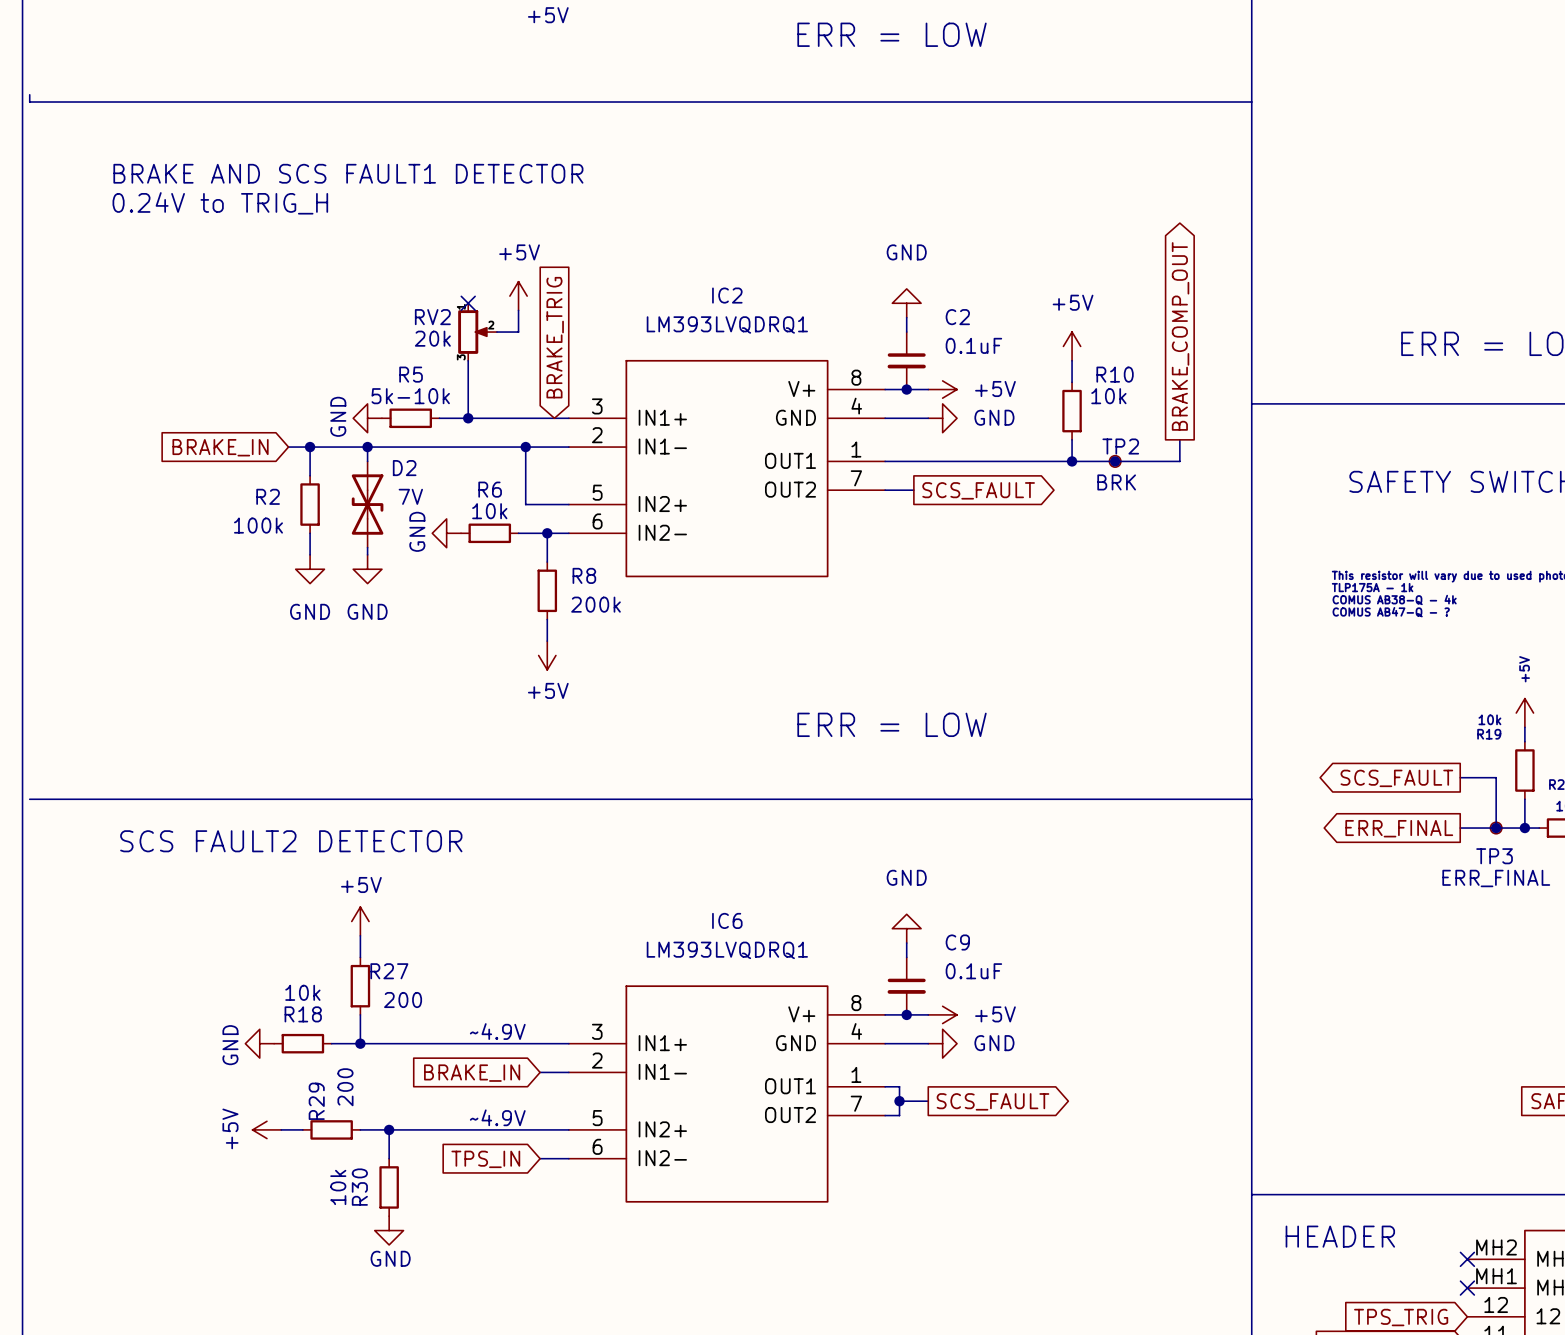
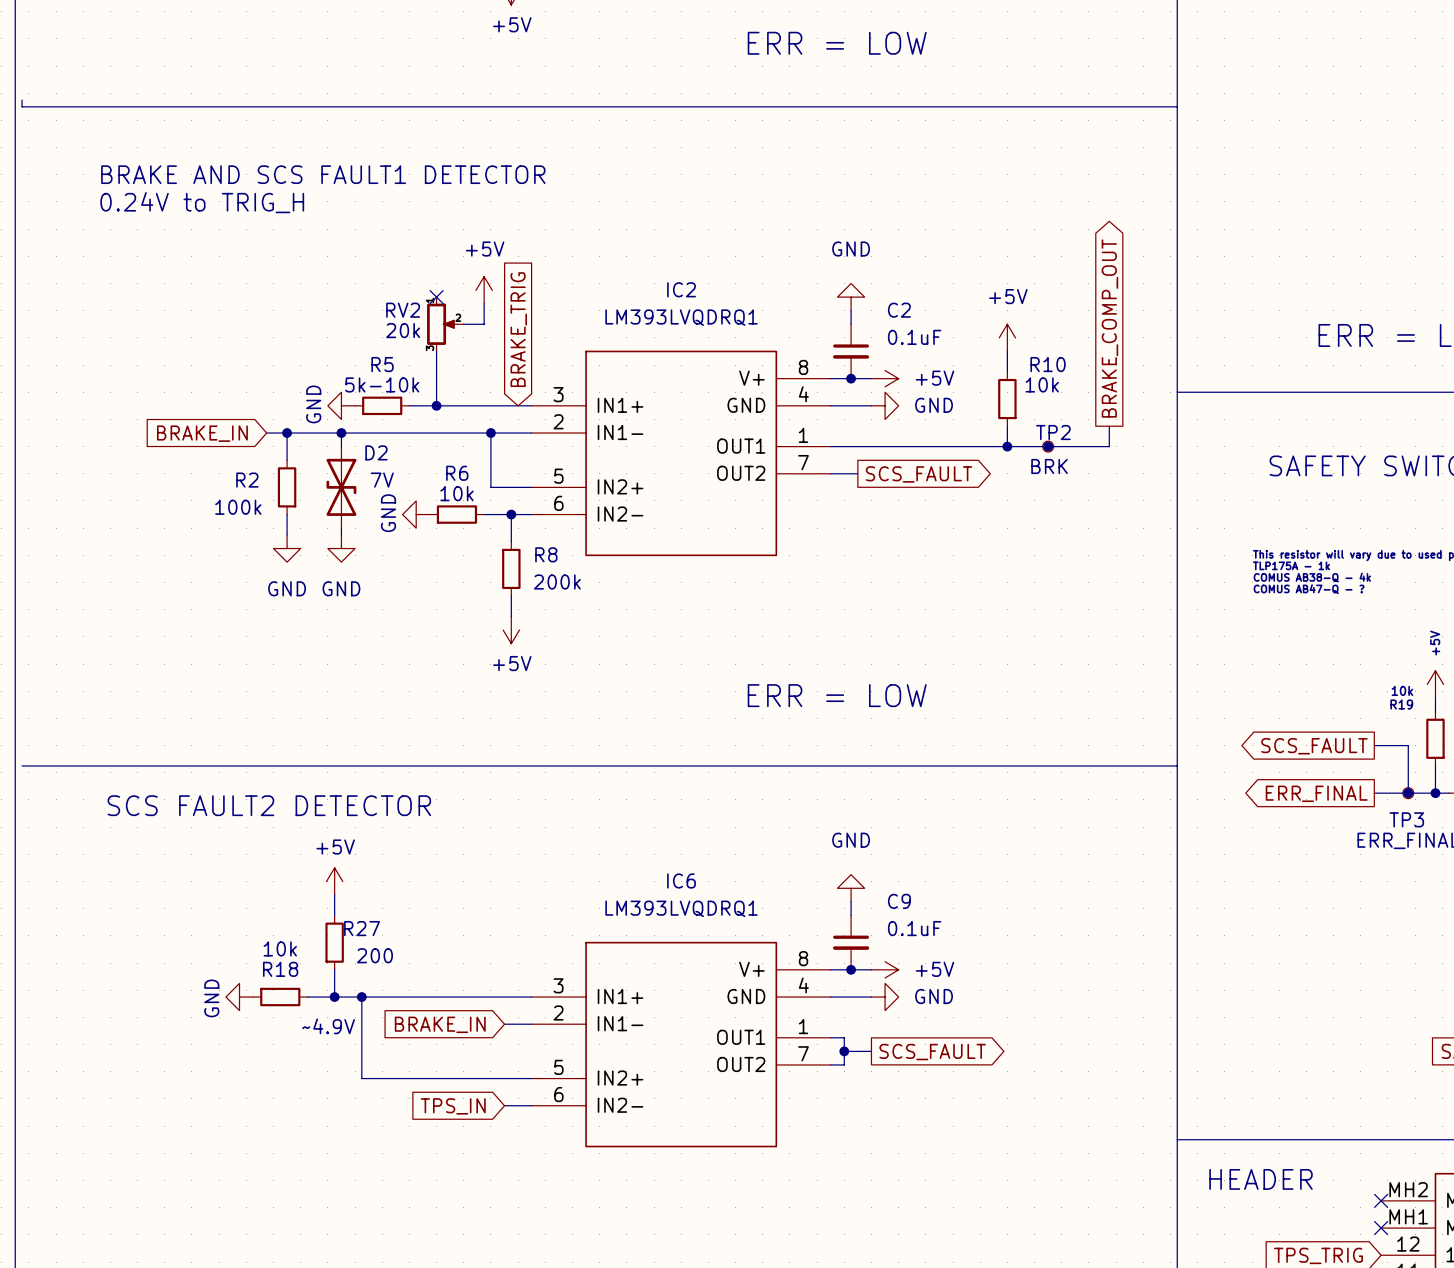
text: ~4.9V (497, 1031) -> none
wire: none -> (361, 997) (361, 1078)
junction: none -> (361, 997)
text: none -> ~4.9V (328, 1026)
text: ~4.9V (497, 1117) -> none
power symbol: +5V (266, 1129) -> none
wire: (281, 1129) (302, 1129) -> none
R29: 200 (331, 1129) -> none
wire: (360, 1129) (389, 1129) (389, 1158) -> none
junction: (389, 1129) -> none
R30: 10k (389, 1187) -> none
power symbol: GND (389, 1230) -> none

